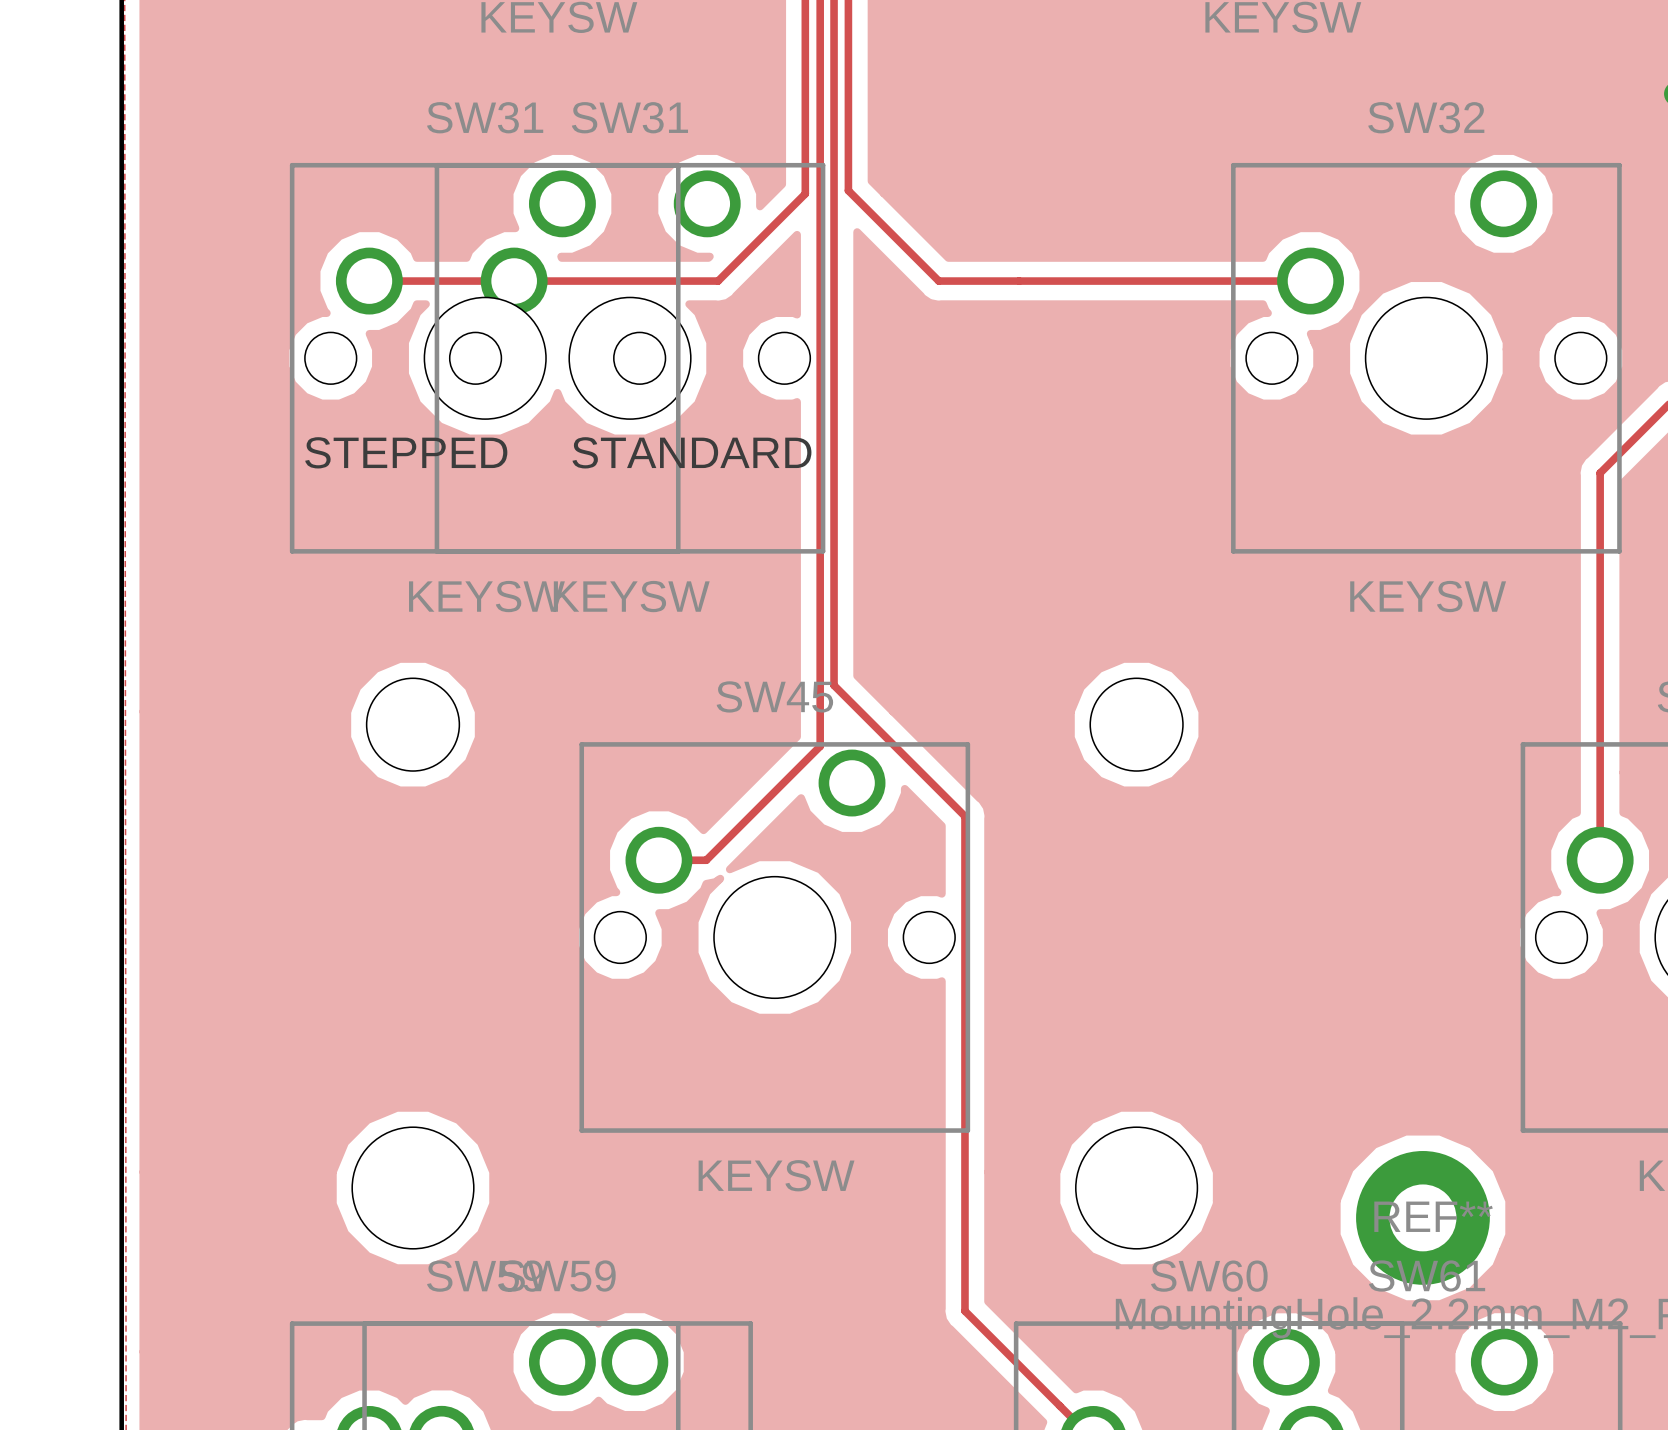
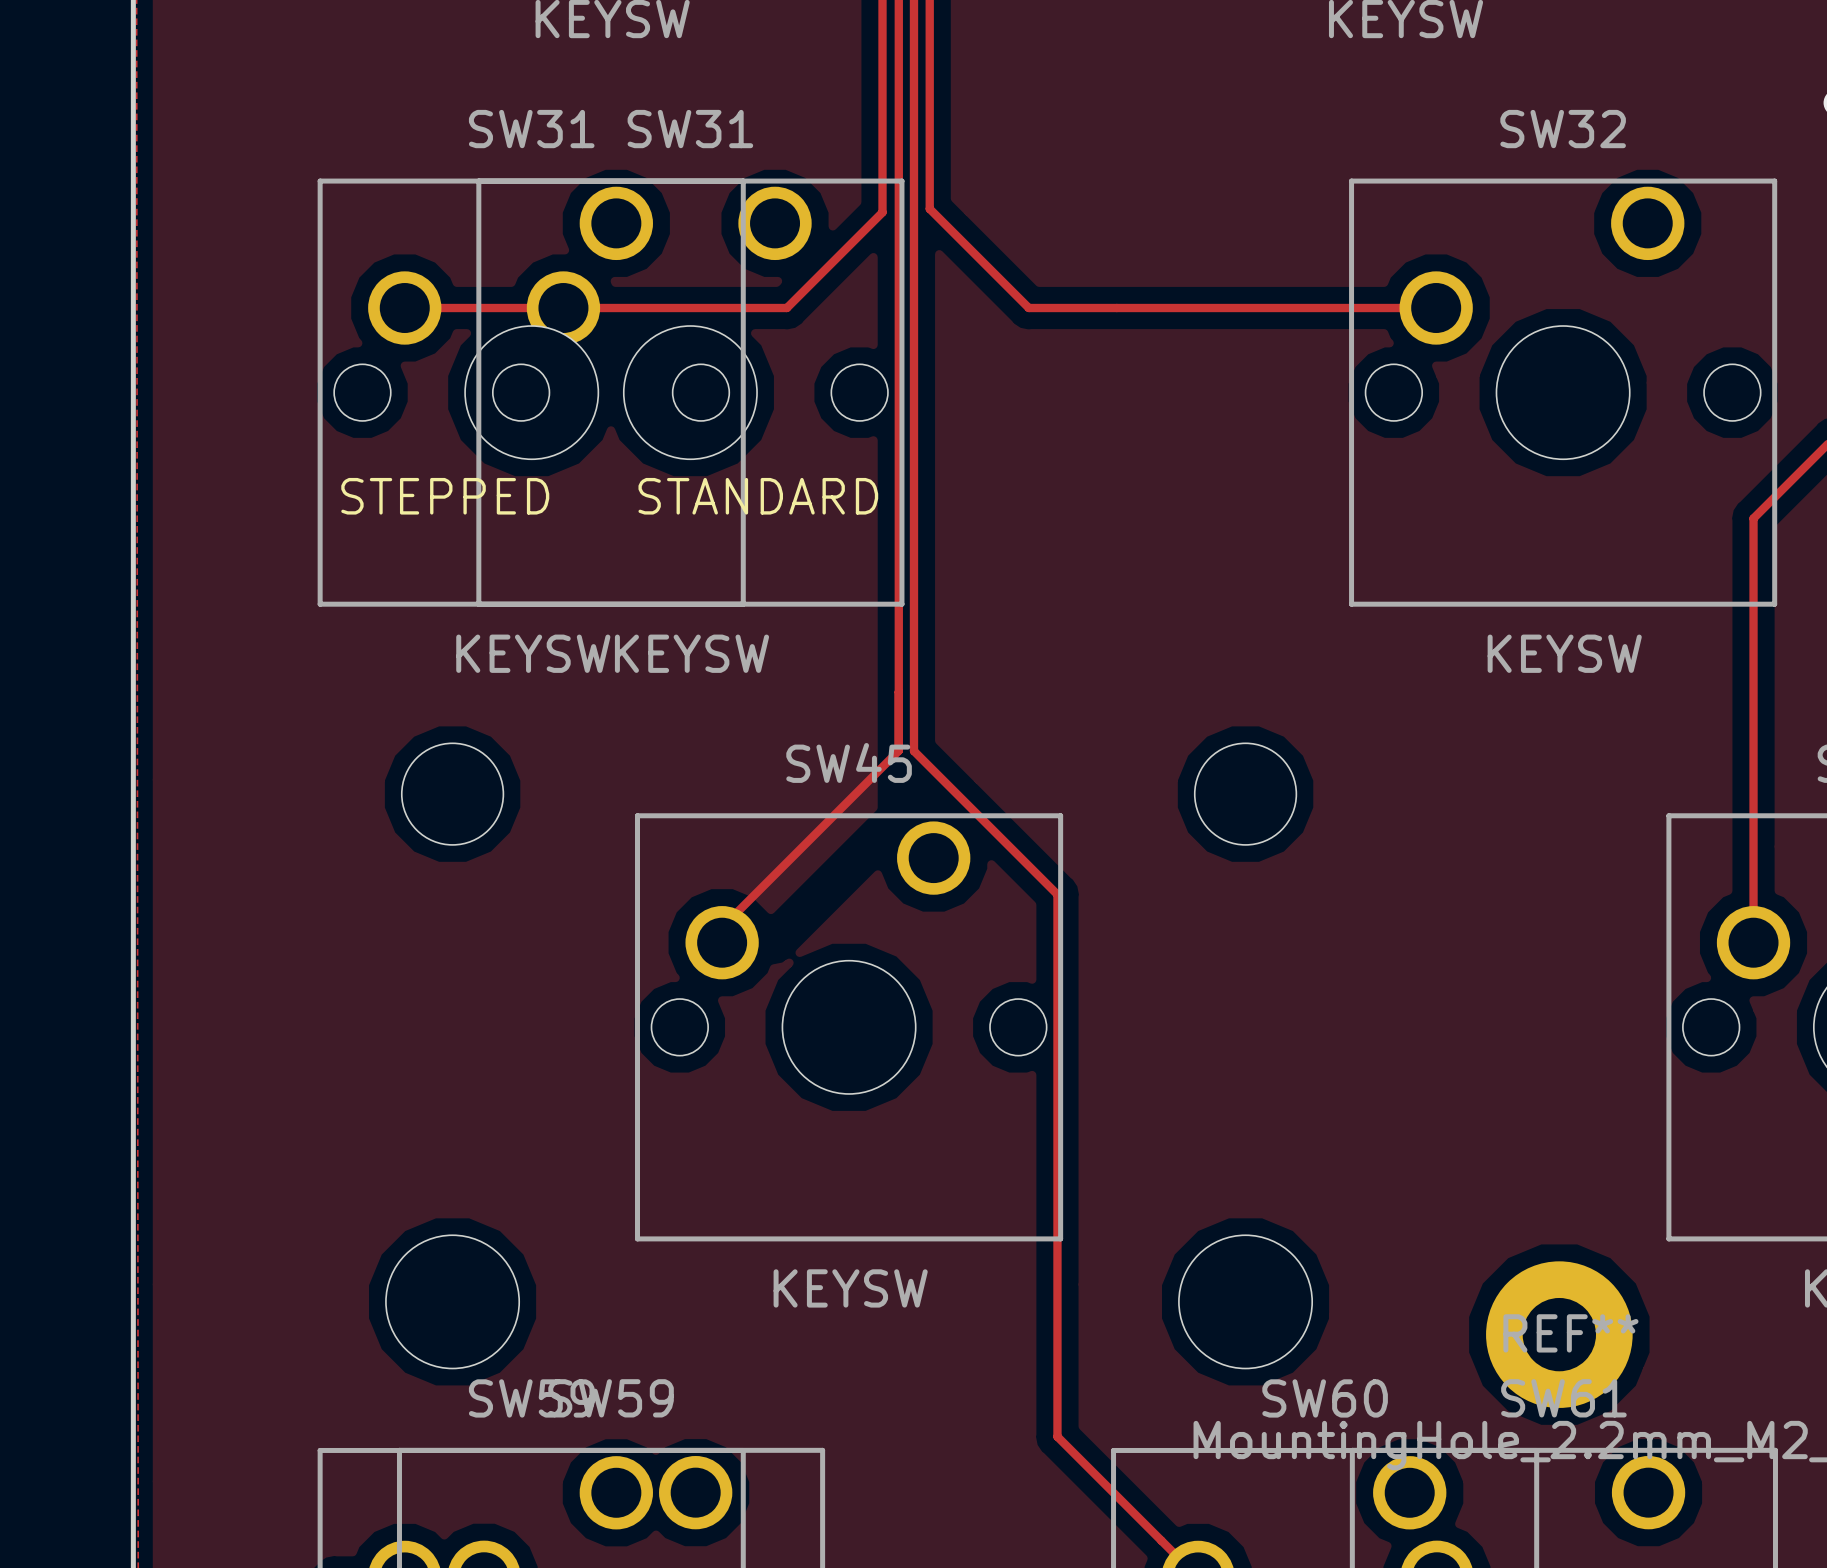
track: (820, 685) (820, 746) (706, 860) (658, 860) -> (898, 750) (722, 927) (722, 942)

